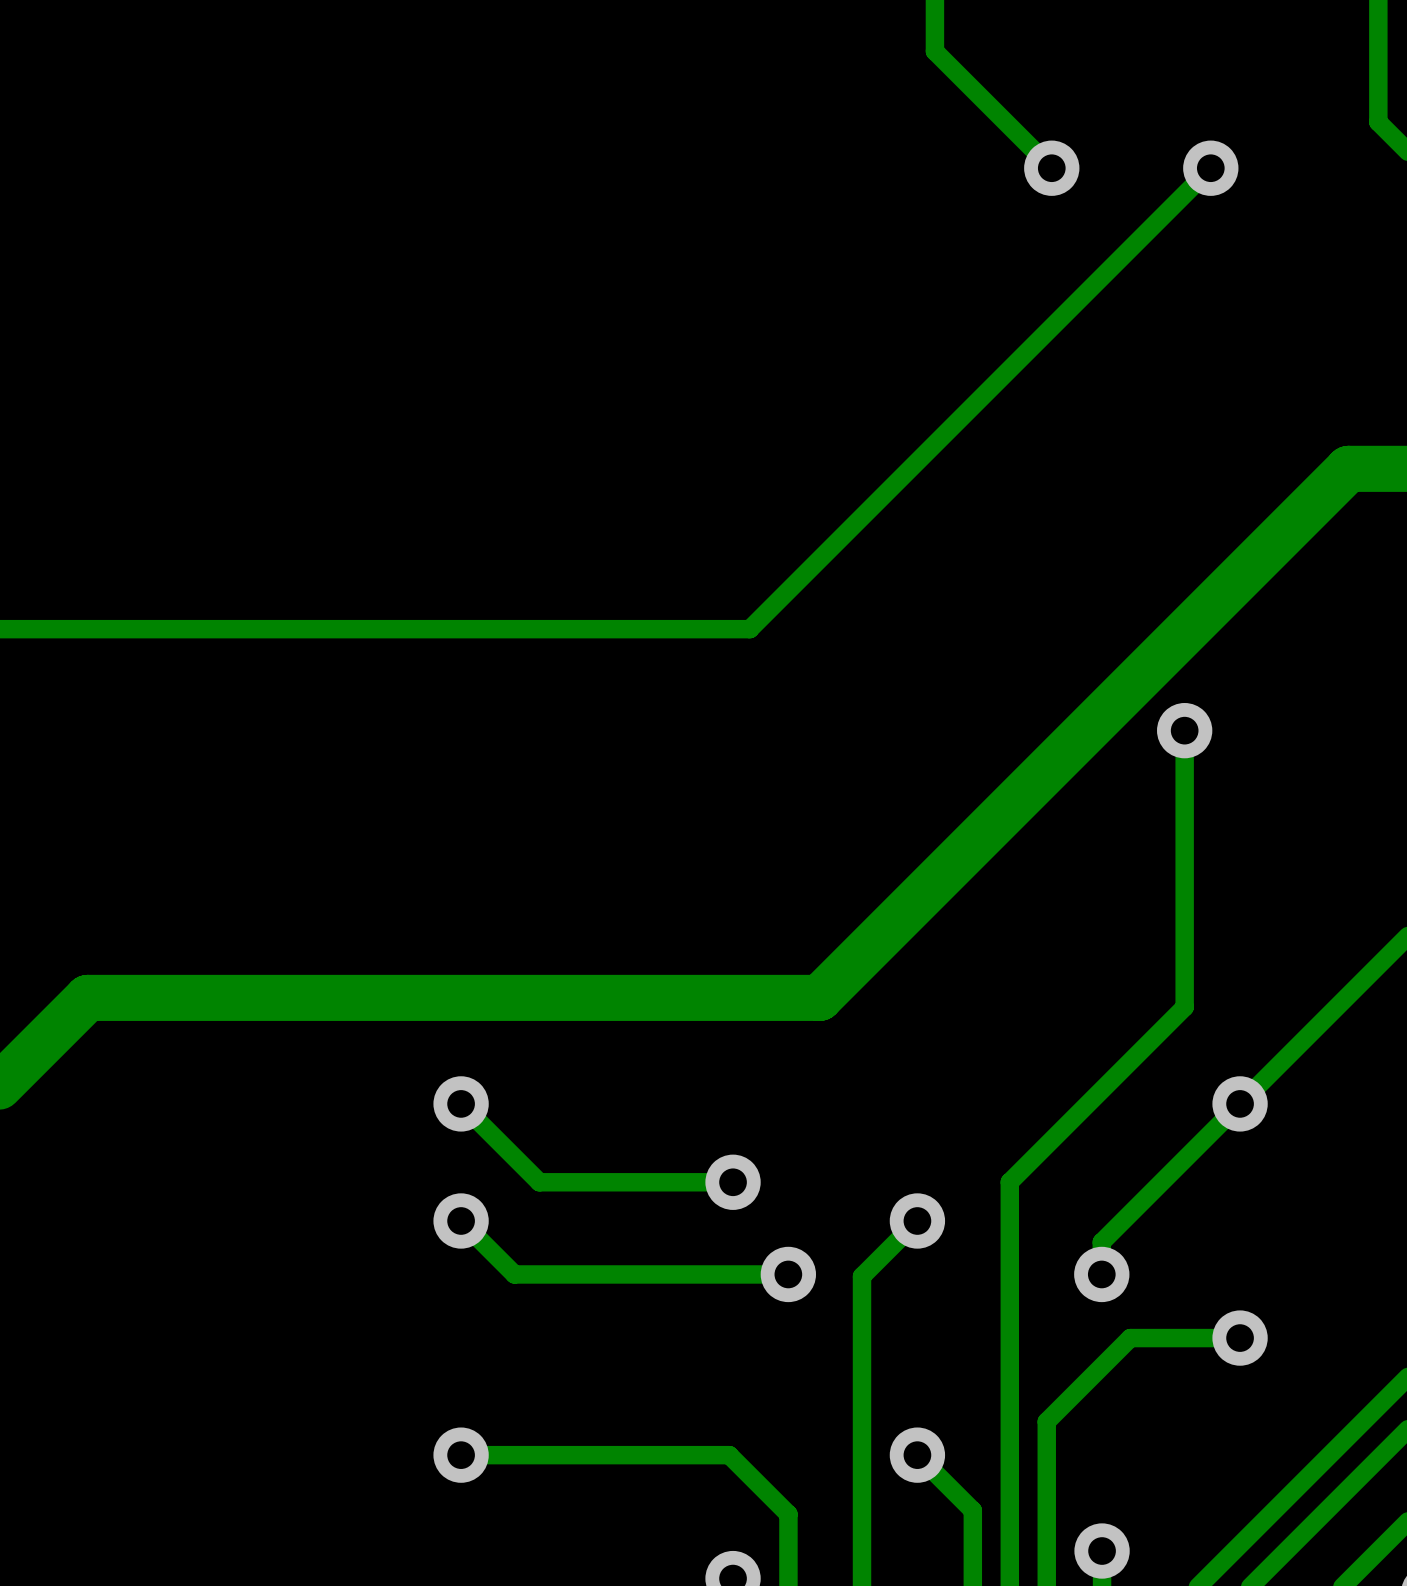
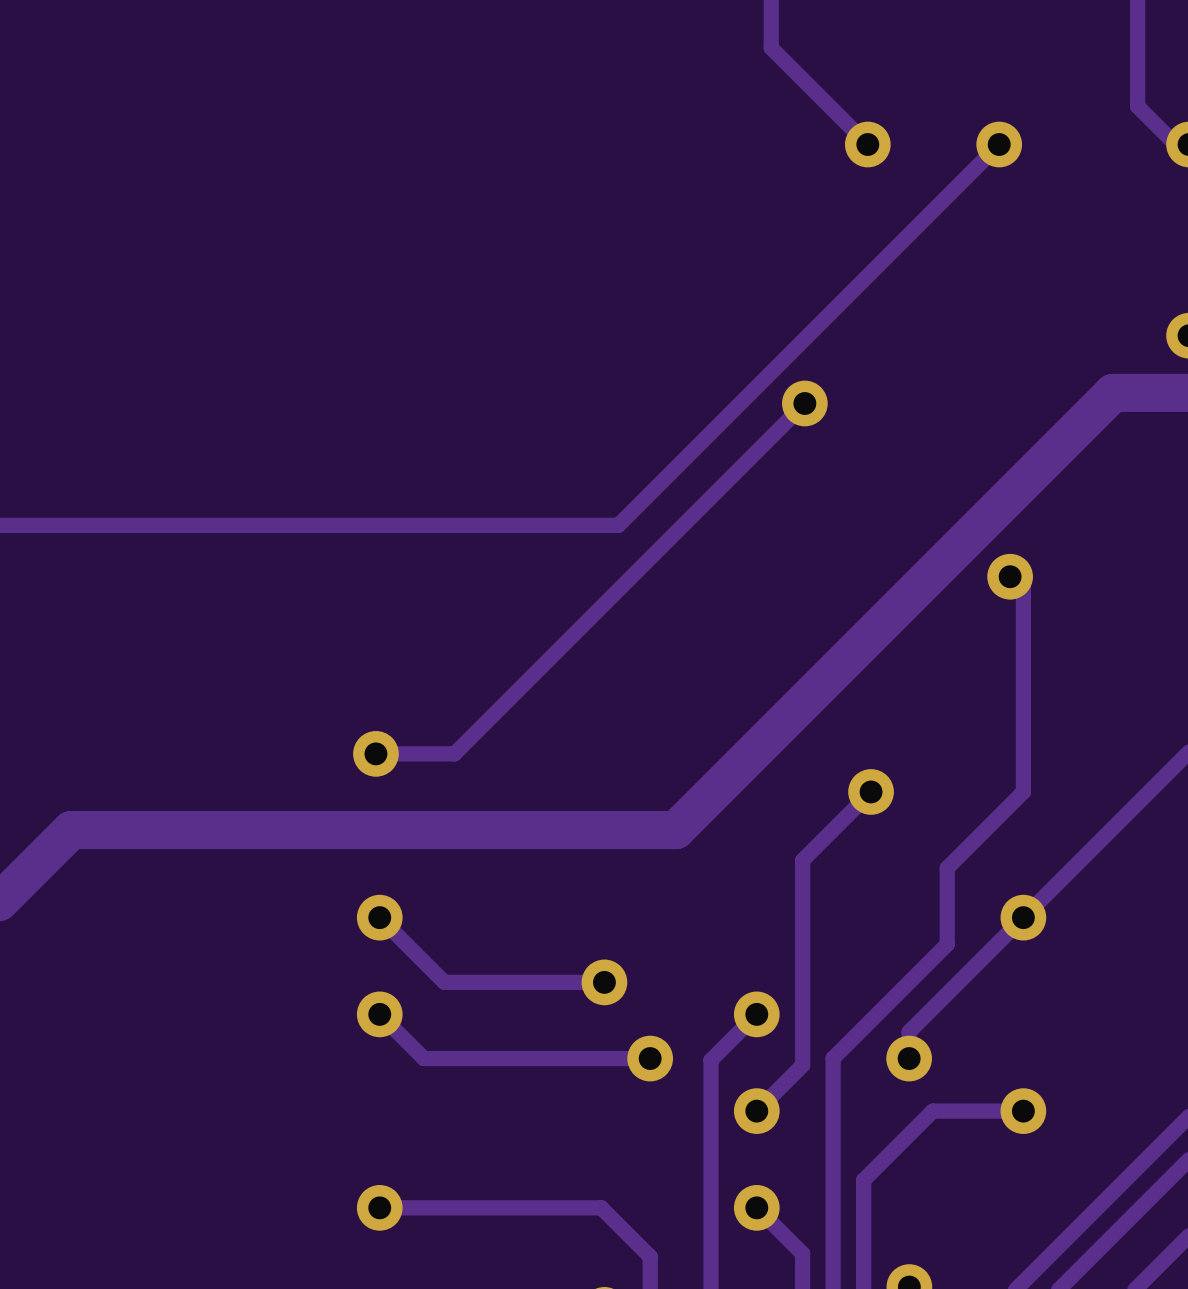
track: none -> (804, 403) (454, 753) (375, 753)
via: none -> (804, 403)
track: (1184, 730) (1184, 1007) -> (1010, 576) (1023, 590) (1023, 791) (977, 837)
via position: (1184, 730) -> (1010, 576)
via: none -> (375, 753)
track: none -> (871, 791) (802, 860) (802, 1065) (756, 1111)
via: none -> (871, 791)
track: (1147, 1043) (1009, 1182) (1009, 1274) -> (947, 868) (947, 944) (833, 1058)
via: none -> (756, 1111)

